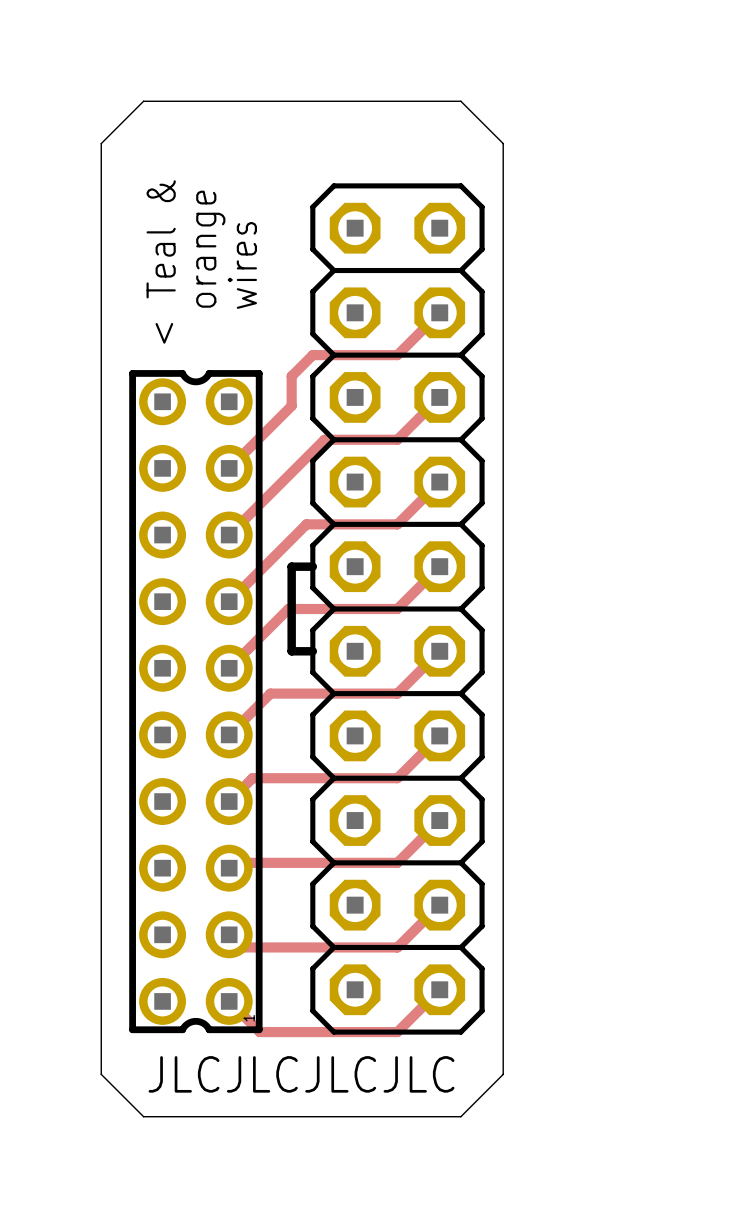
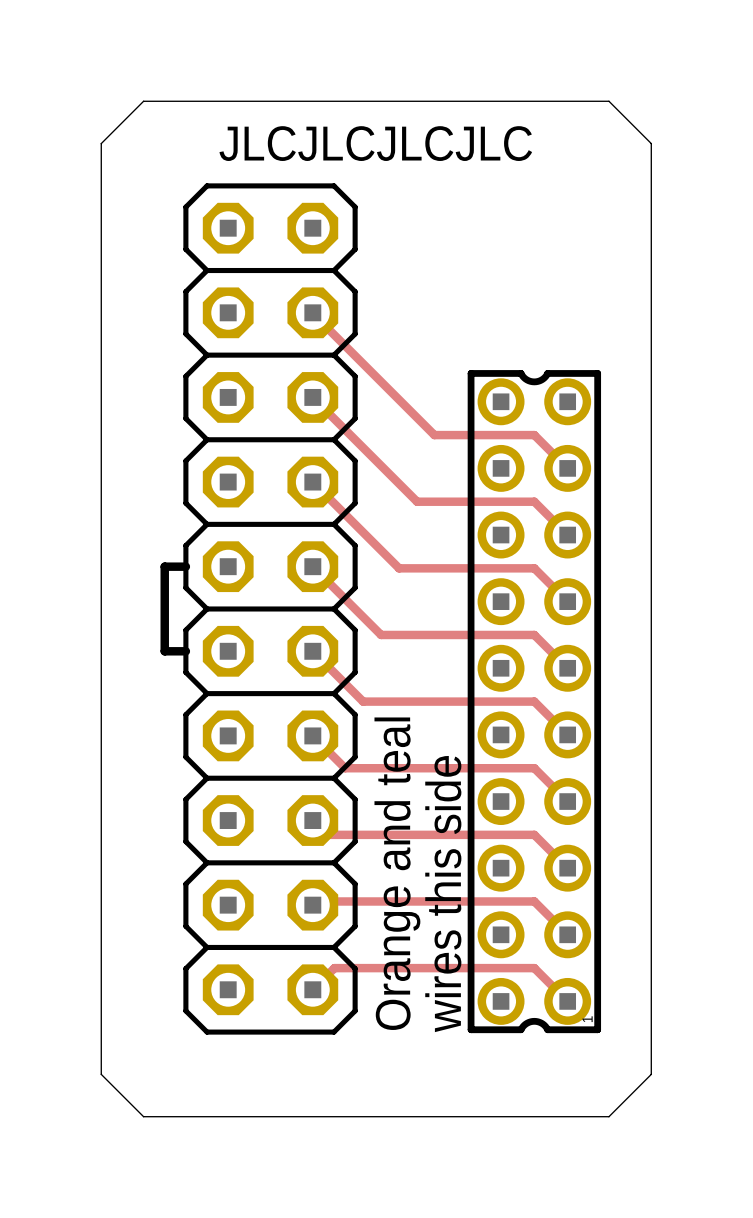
board edge: (460, 101) (503, 143) (503, 1074) (460, 1116) -> (460, 101) (608, 101) (651, 143) (651, 1074) (608, 1116) (460, 1116)
text: none -> JLCJLCJLCJLC (375, 143)
text: orange (210, 249) -> none
text: < Teal & (161, 261) -> none
text: wires (242, 265) -> none
track: (439, 312) (397, 355) (312, 355) (291, 376) (291, 405) (229, 468) -> none
track: none -> (312, 313) (434, 435) (534, 435) (567, 468)
track: none -> (312, 397) (417, 501) (534, 501) (567, 535)
track: (439, 397) (397, 439) (324, 439) (229, 535) -> none
track: none -> (312, 482) (399, 568) (534, 568) (567, 601)
track: (439, 482) (397, 524) (306, 524) (229, 601) -> none
line: (312, 566) (291, 566) (291, 651) (312, 651) -> (185, 566) (164, 566) (164, 651) (185, 651)
track: none -> (312, 566) (381, 634) (534, 634) (567, 668)
track: (439, 566) (397, 608) (288, 608) (229, 668) -> none
part position: (397, 608) -> (270, 608)
track: none -> (312, 651) (363, 701) (534, 701) (567, 734)
track: (439, 651) (397, 693) (270, 693) (229, 734) -> none
part position: (195, 701) -> (534, 701)
track: none -> (312, 735) (345, 768) (534, 768) (567, 801)
track: (439, 735) (397, 778) (252, 778) (229, 801) -> none
track: none -> (312, 820) (327, 834) (534, 834) (567, 868)
track: (439, 820) (397, 862) (234, 862) (229, 868) -> none
text: none -> Orange and teal (397, 873)
text: none -> wires this side (443, 894)
track: none -> (312, 905) (316, 901) (534, 901) (567, 934)
track: (439, 905) (397, 947) (241, 947) (229, 934) -> none
track: none -> (312, 989) (334, 968) (534, 968) (567, 1001)
track: (439, 989) (397, 1032) (259, 1032) (229, 1001) -> none
text: JLCJLCJLCJLC (301, 1074) -> none

